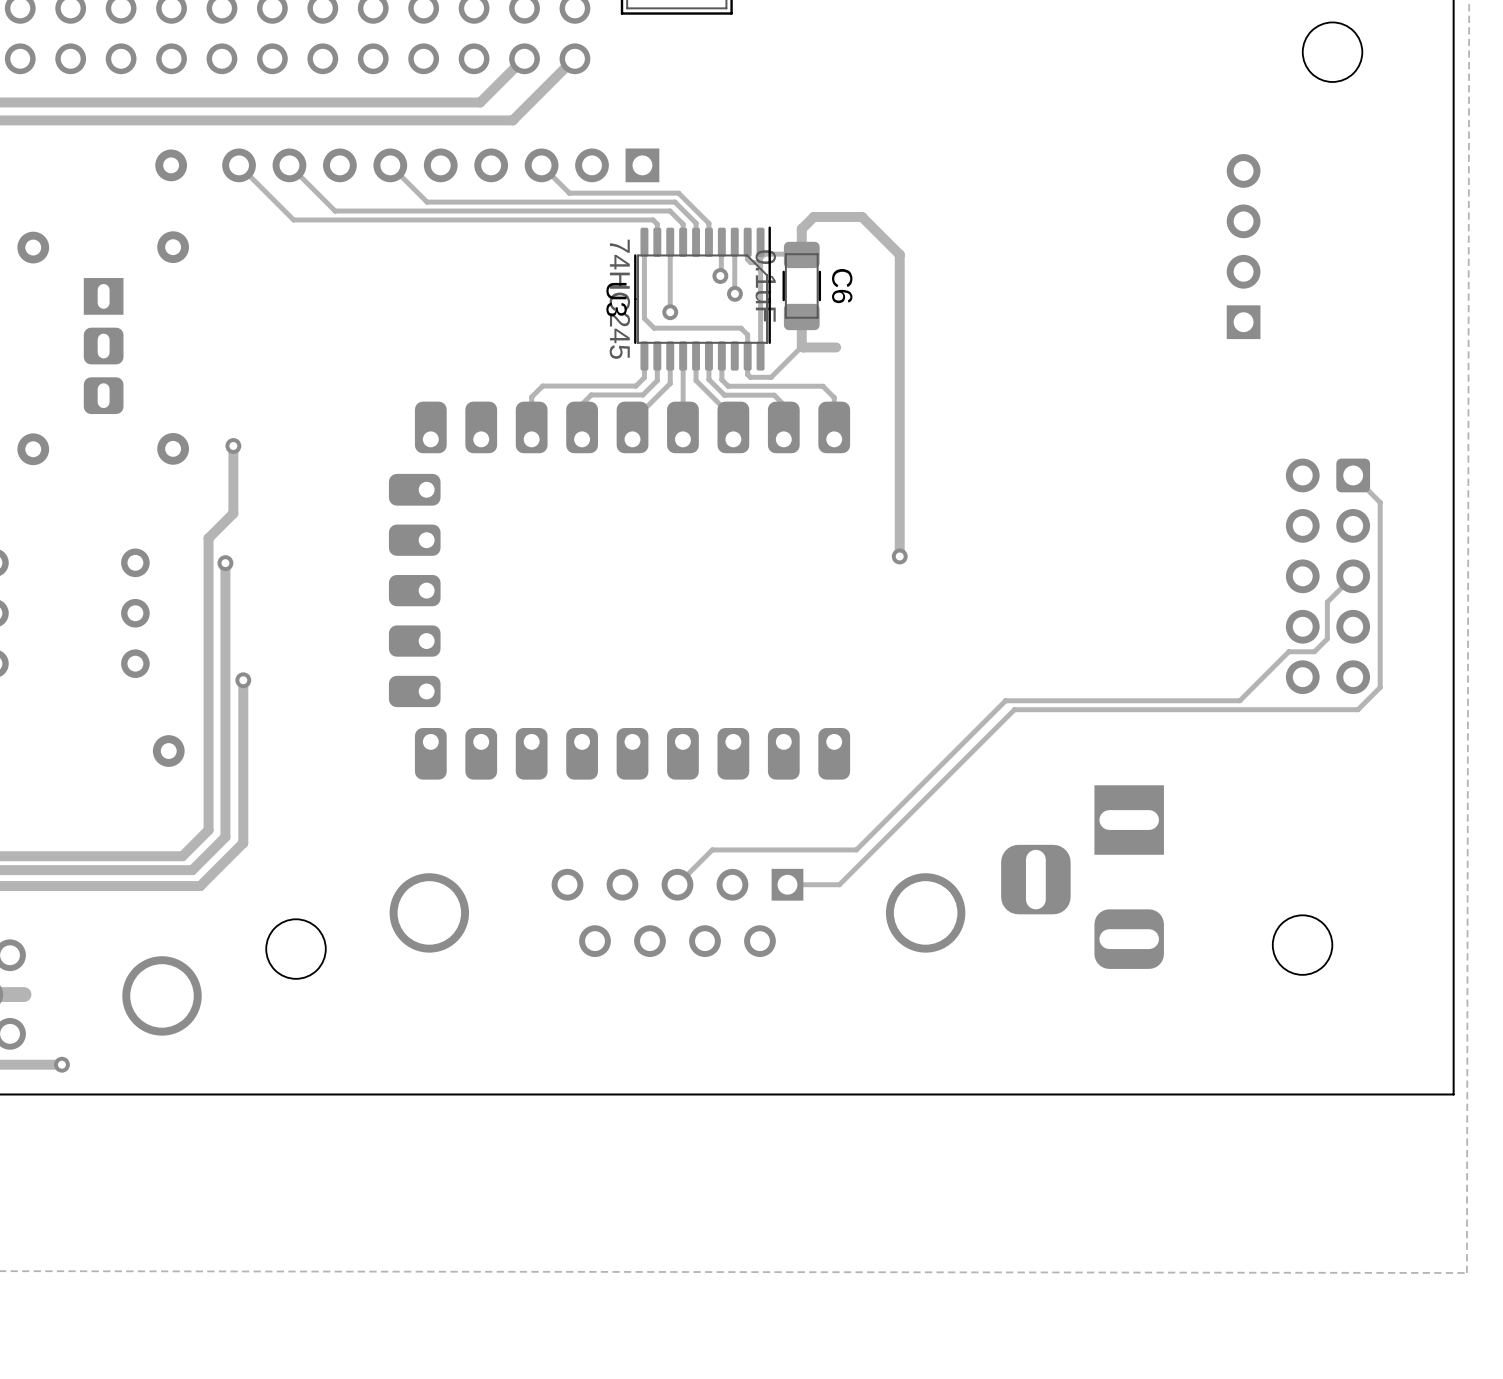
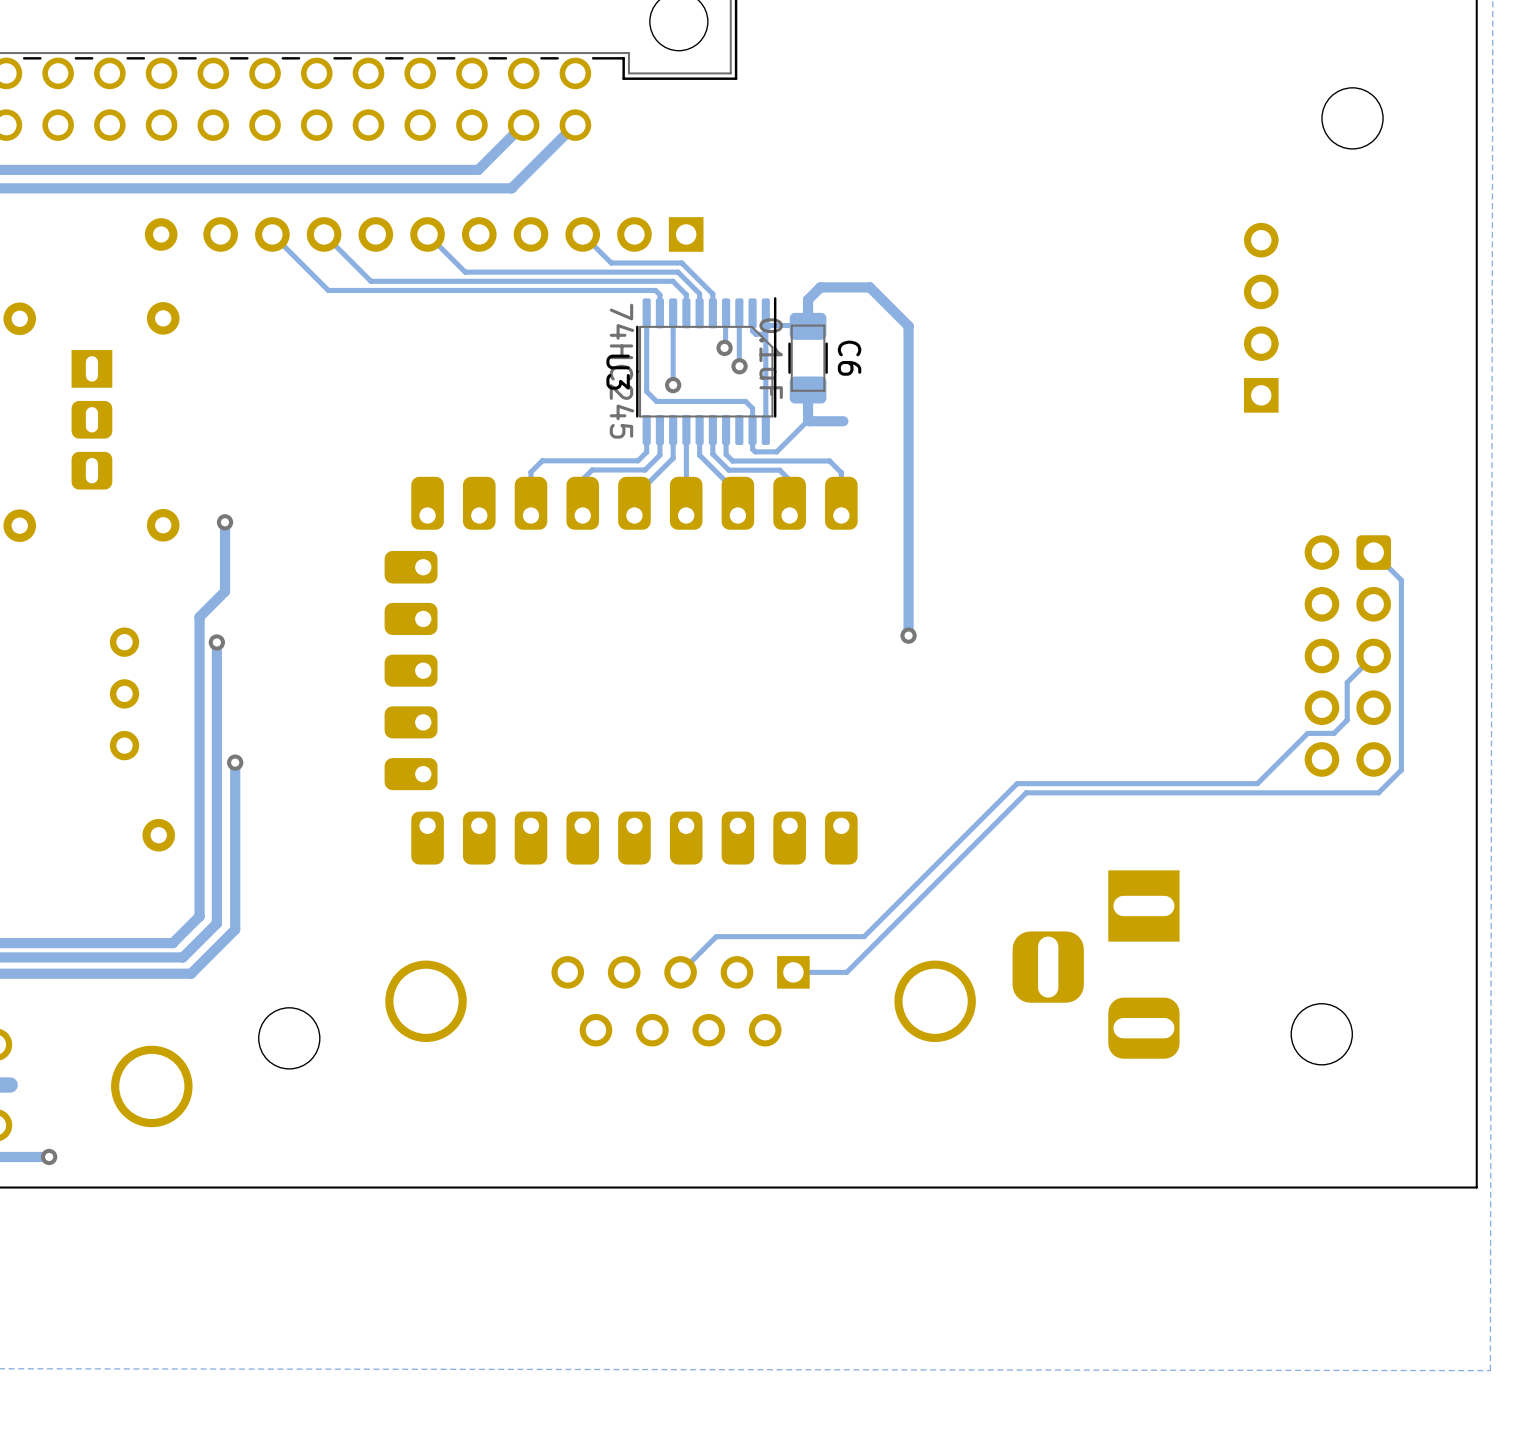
part footprint: [222, 148, 660, 183] -> [203, 217, 704, 252]
track: (239, 165) (293, 219) (334, 219) -> (272, 234) (328, 290)
track: (289, 165) (335, 211) (375, 211) -> (324, 234) (370, 281)
track: (390, 165) (427, 202) (467, 202) -> (427, 234) (465, 272)
track: (541, 165) (569, 193) (609, 193) -> (582, 234) (611, 262)

